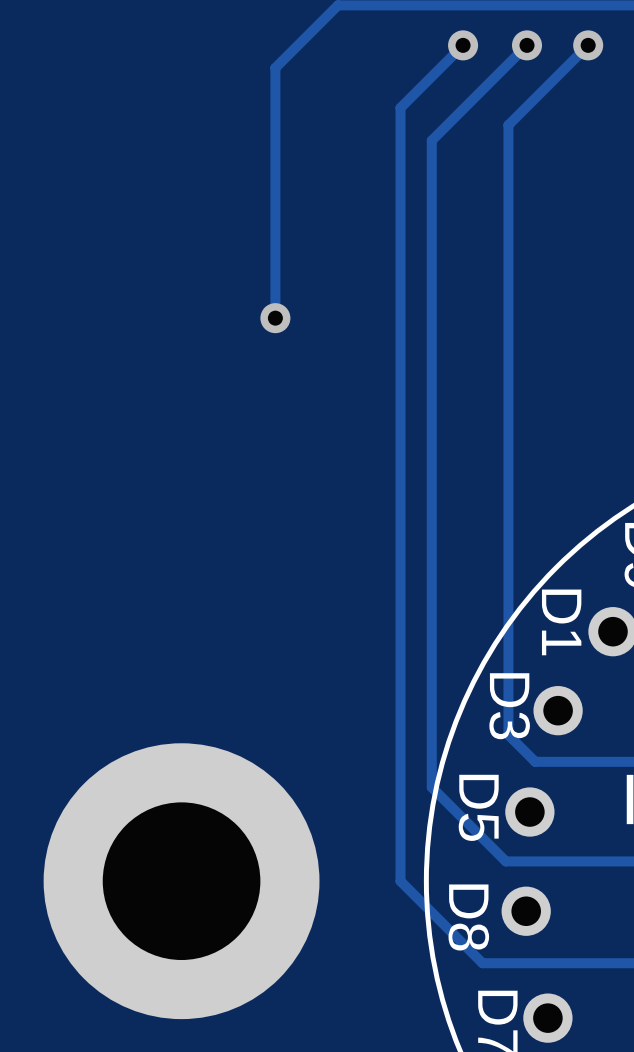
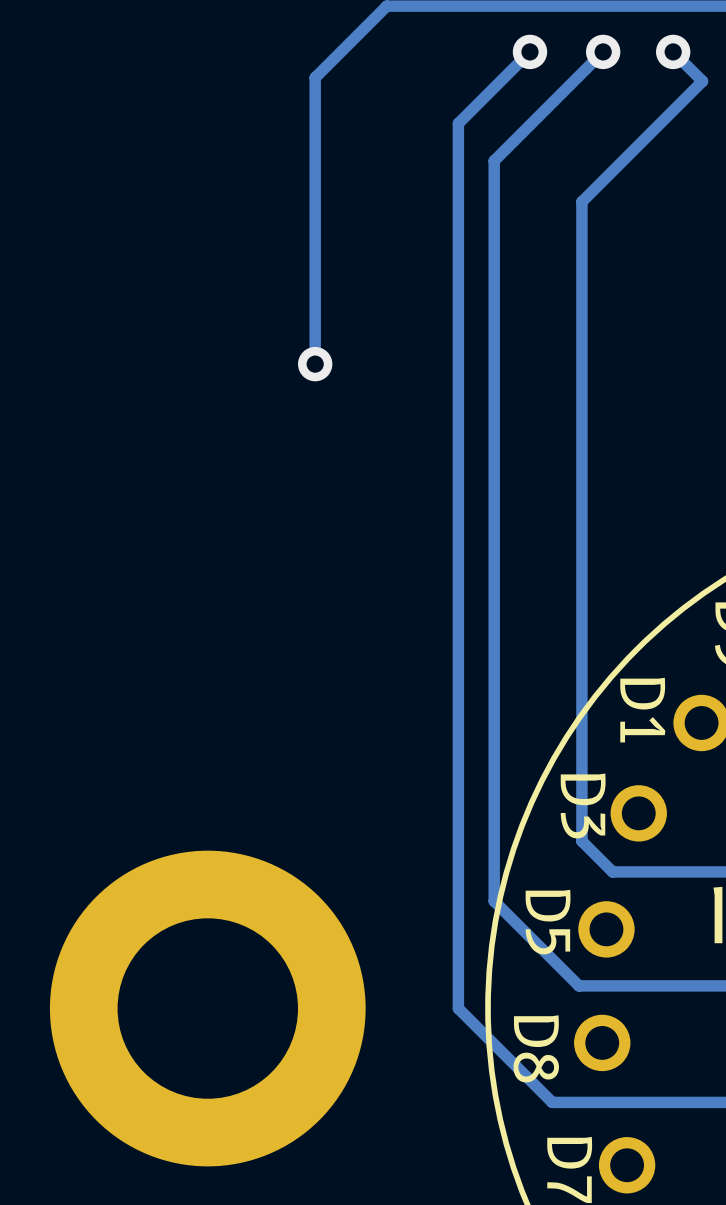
track: (588, 45) (508, 125) (508, 176) -> (673, 51) (702, 81) (581, 201)

